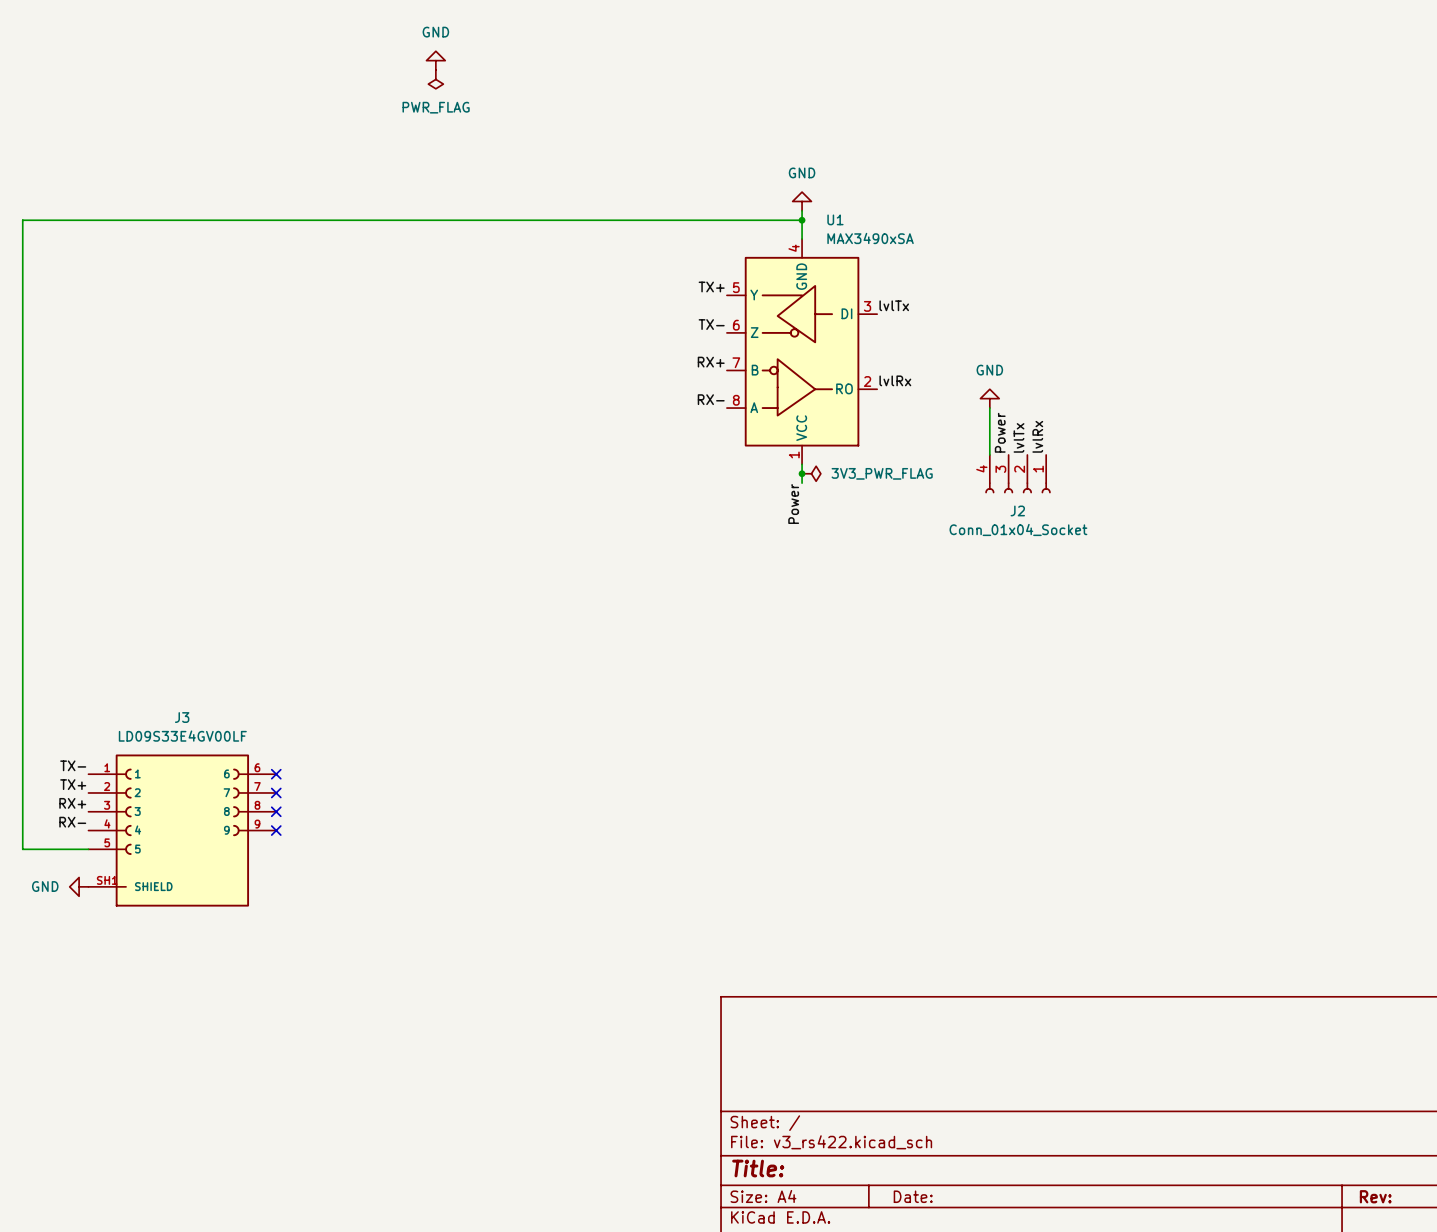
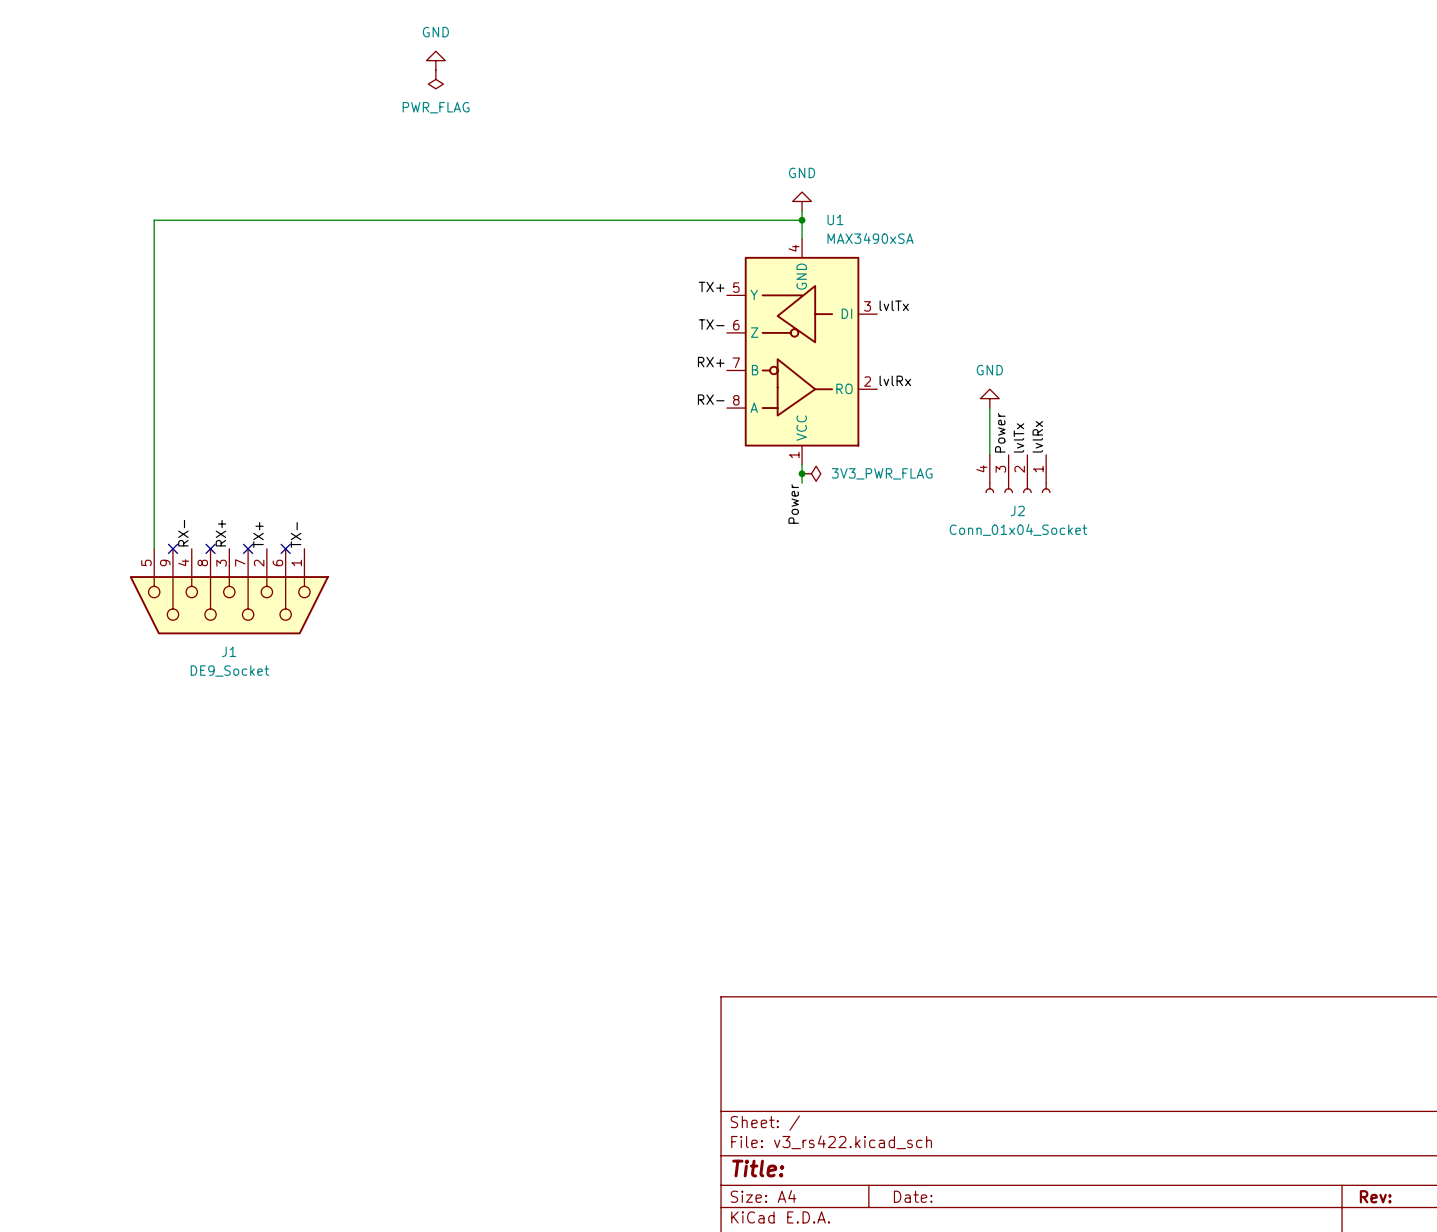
wire: (154, 220) (22, 220) (22, 849) (88, 849) -> (154, 220) (154, 548)
label: none -> RX- (183, 533)
label: none -> RX+ (220, 533)
label: none -> TX+ (258, 534)
label: none -> TX- (296, 534)
no-connect mark: none -> (172, 548)
no-connect mark: none -> (210, 548)
no-connect mark: none -> (248, 548)
no-connect mark: none -> (285, 548)
J1: none -> DE9_Socket (229, 591)
label: TX- (73, 765) -> none
no-connect mark: (276, 774) -> none
label: TX+ (73, 784) -> none
no-connect mark: (276, 792) -> none
label: RX+ (72, 803) -> none
no-connect mark: (276, 811) -> none
label: RX- (72, 822) -> none
J3: LD09S33E4GV00LF (182, 830) -> none
no-connect mark: (276, 830) -> none
power symbol: GND (79, 886) -> none

